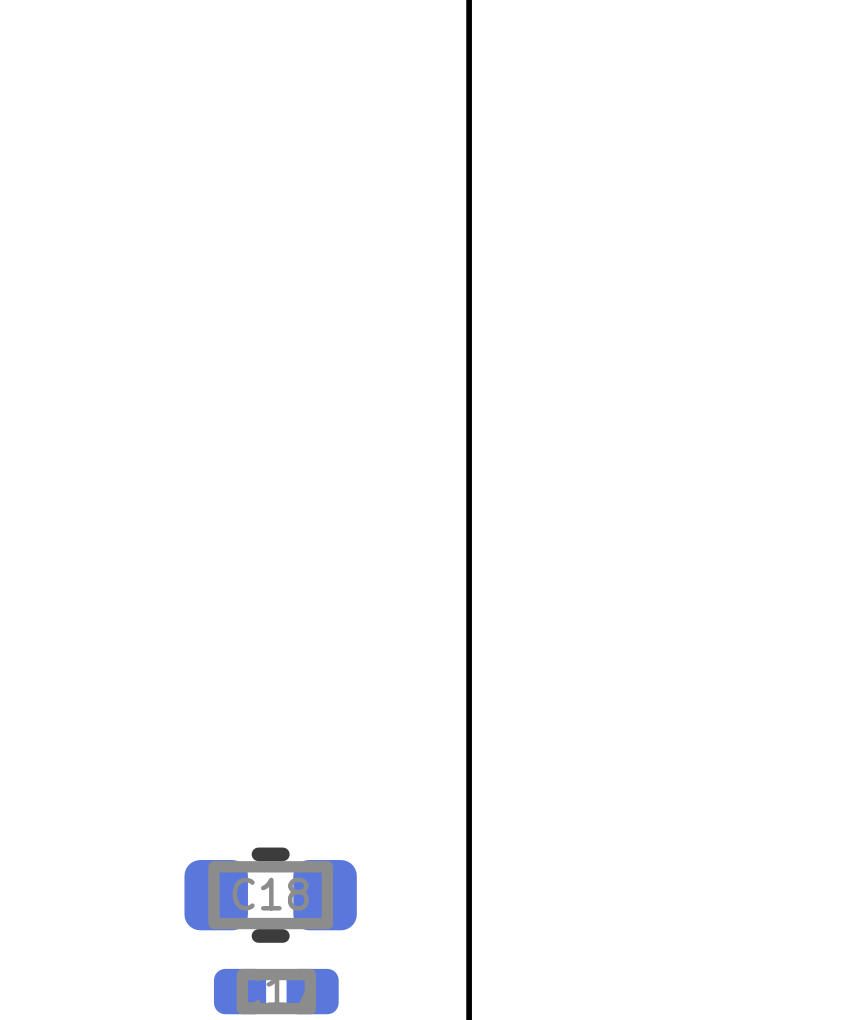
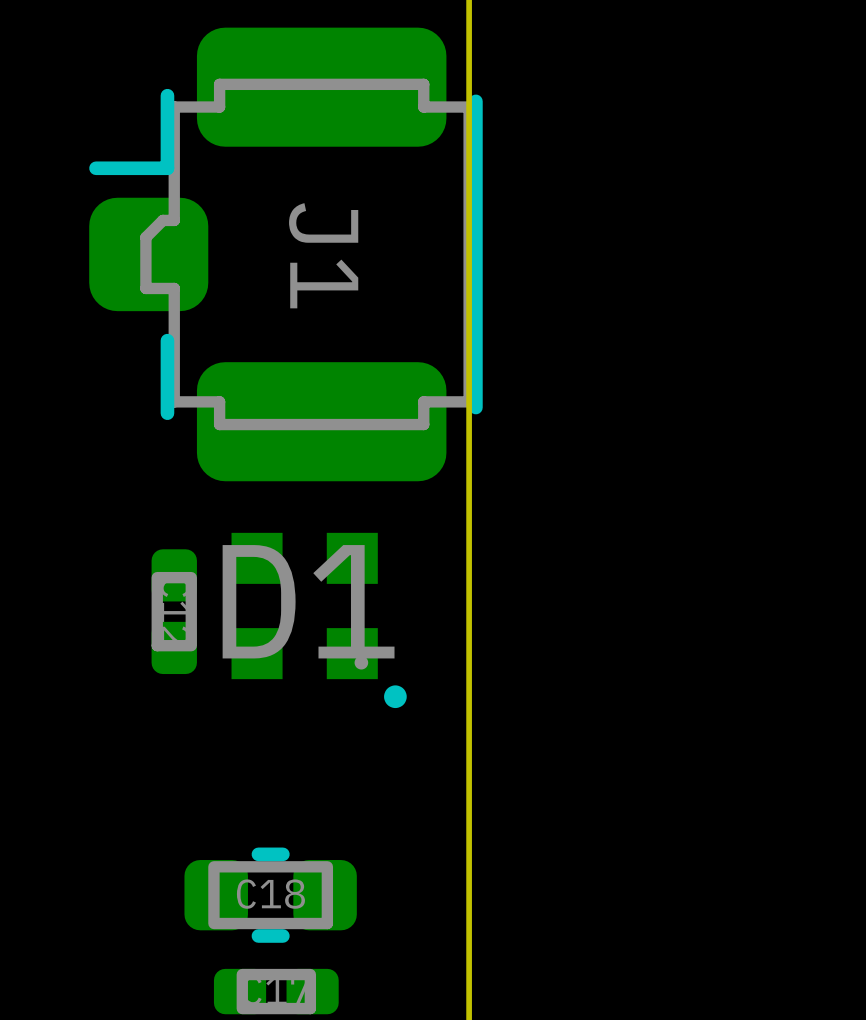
J1: none -> (285, 254)
part: none -> (174, 611)
D1: none -> (319, 620)

